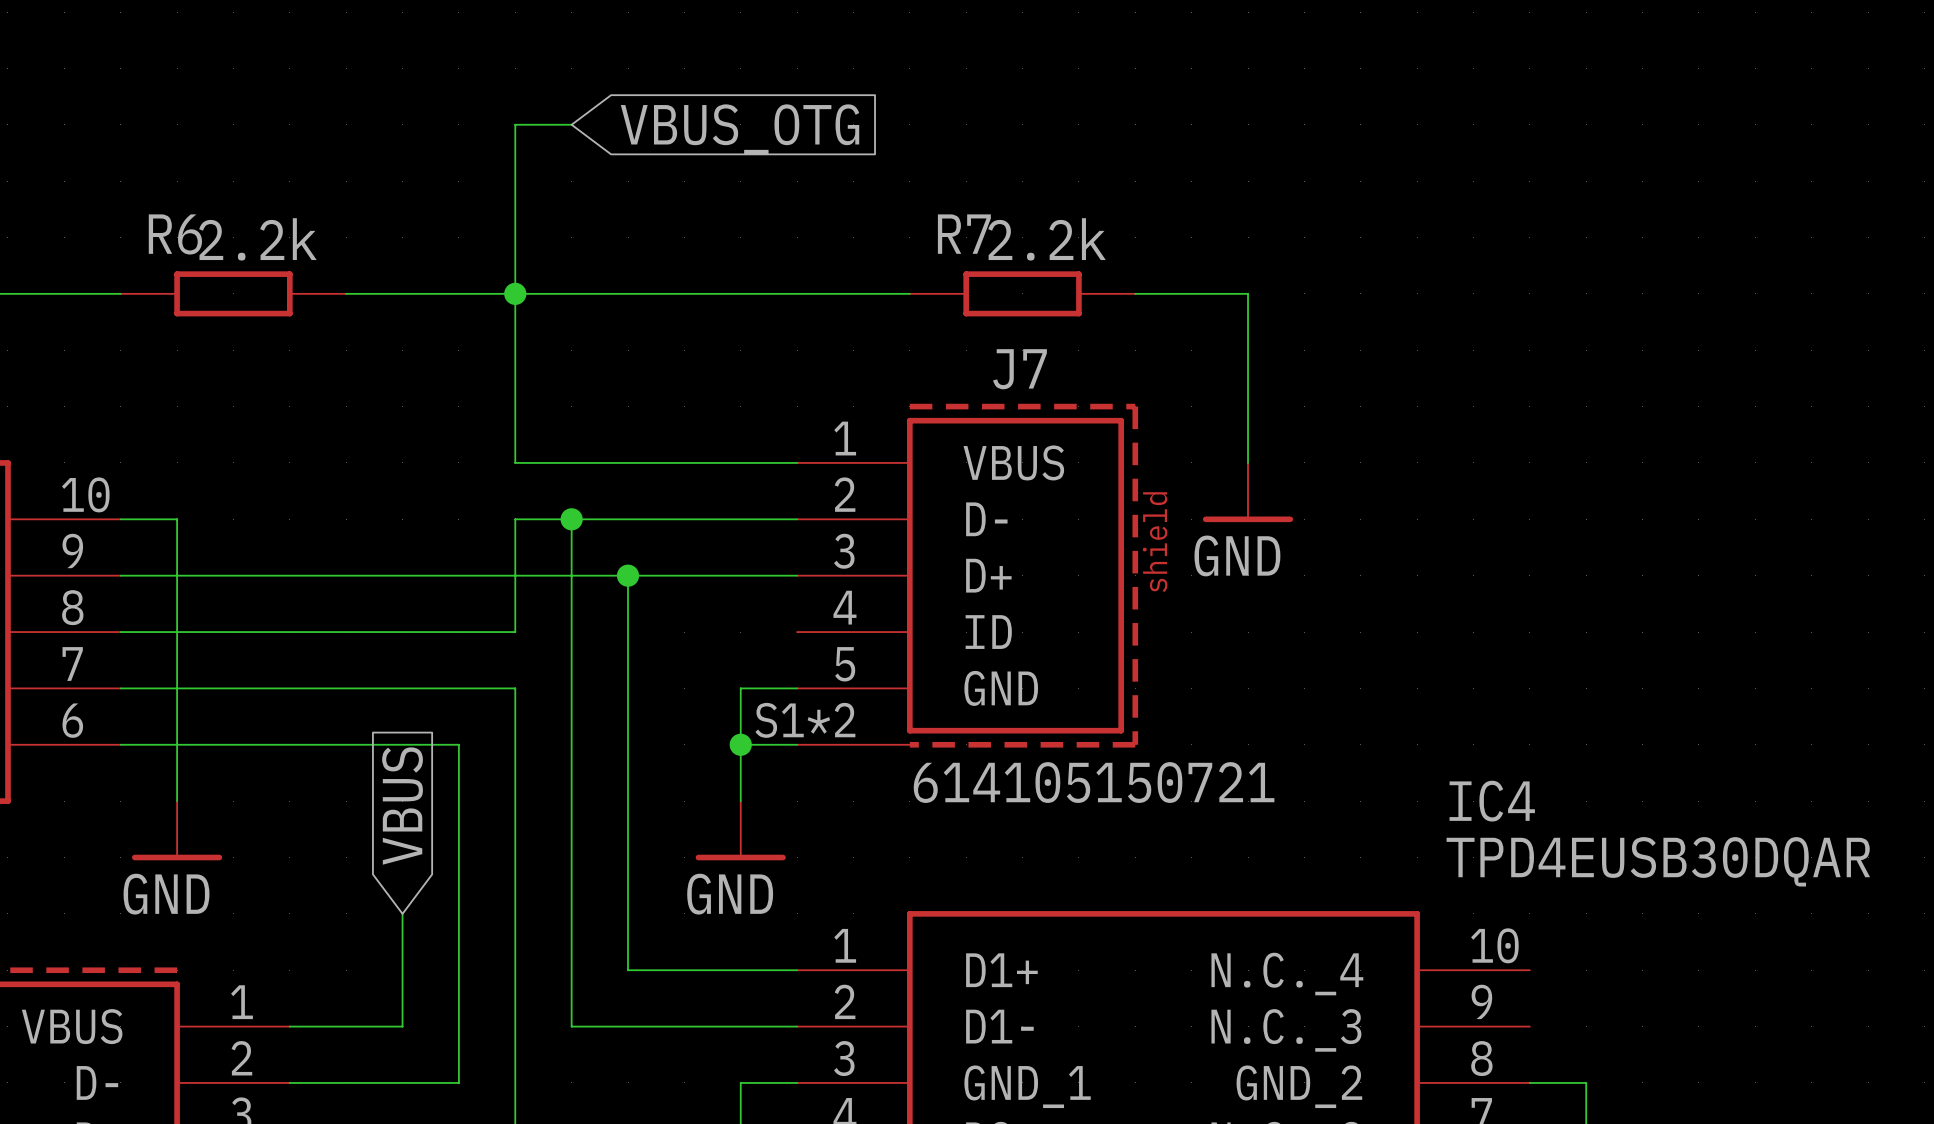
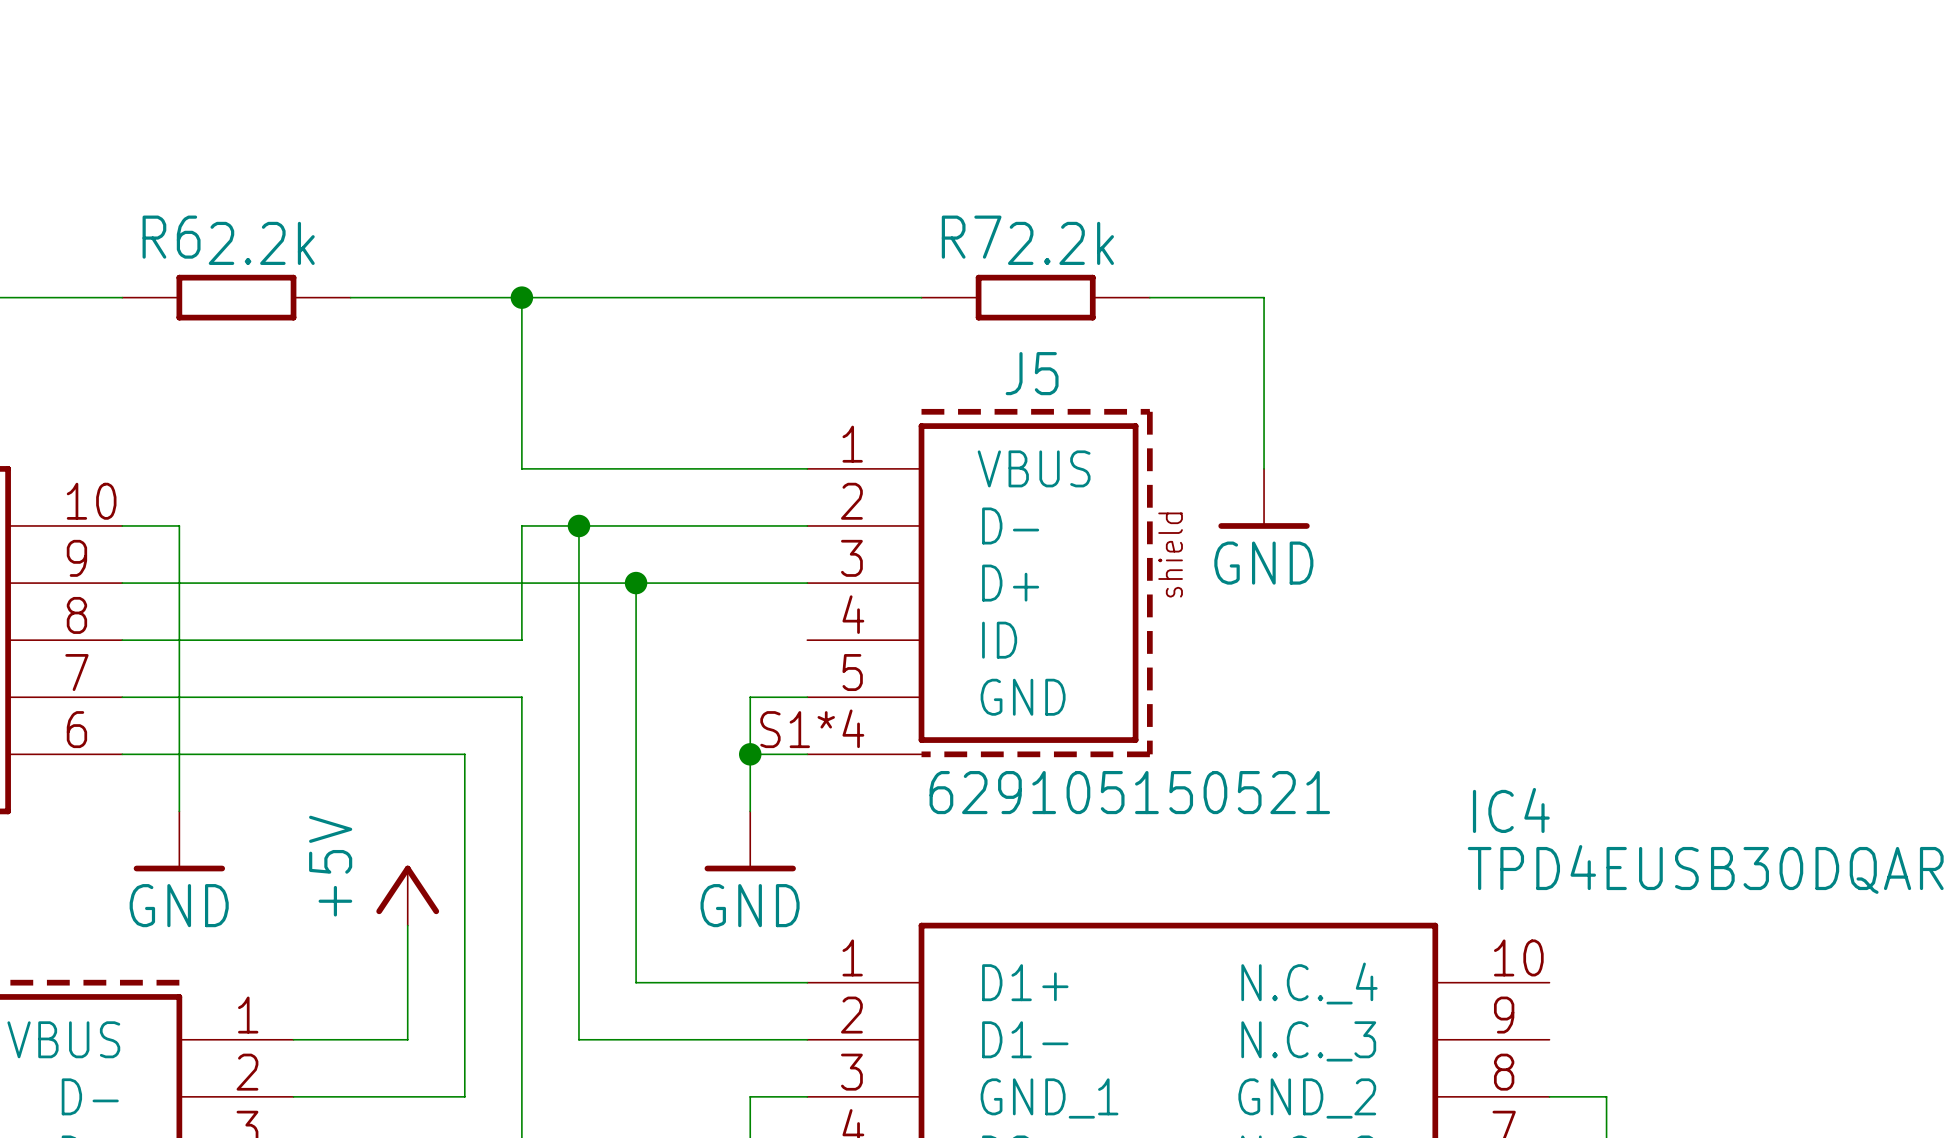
wire: (571, 124) (515, 124) (515, 293) -> none
global label: VBUS_OTG (740, 129) -> none
J7 name: J7 (1020, 369) -> J5 (1032, 373)
J7 pin number: S1*2 (805, 720) -> S1*4 (812, 728)
J7 value: 614105150721 (1094, 782) -> 629105150521 (1129, 792)
global label: VBUS (402, 806) -> none
power symbol: none -> +5V (407, 895)

